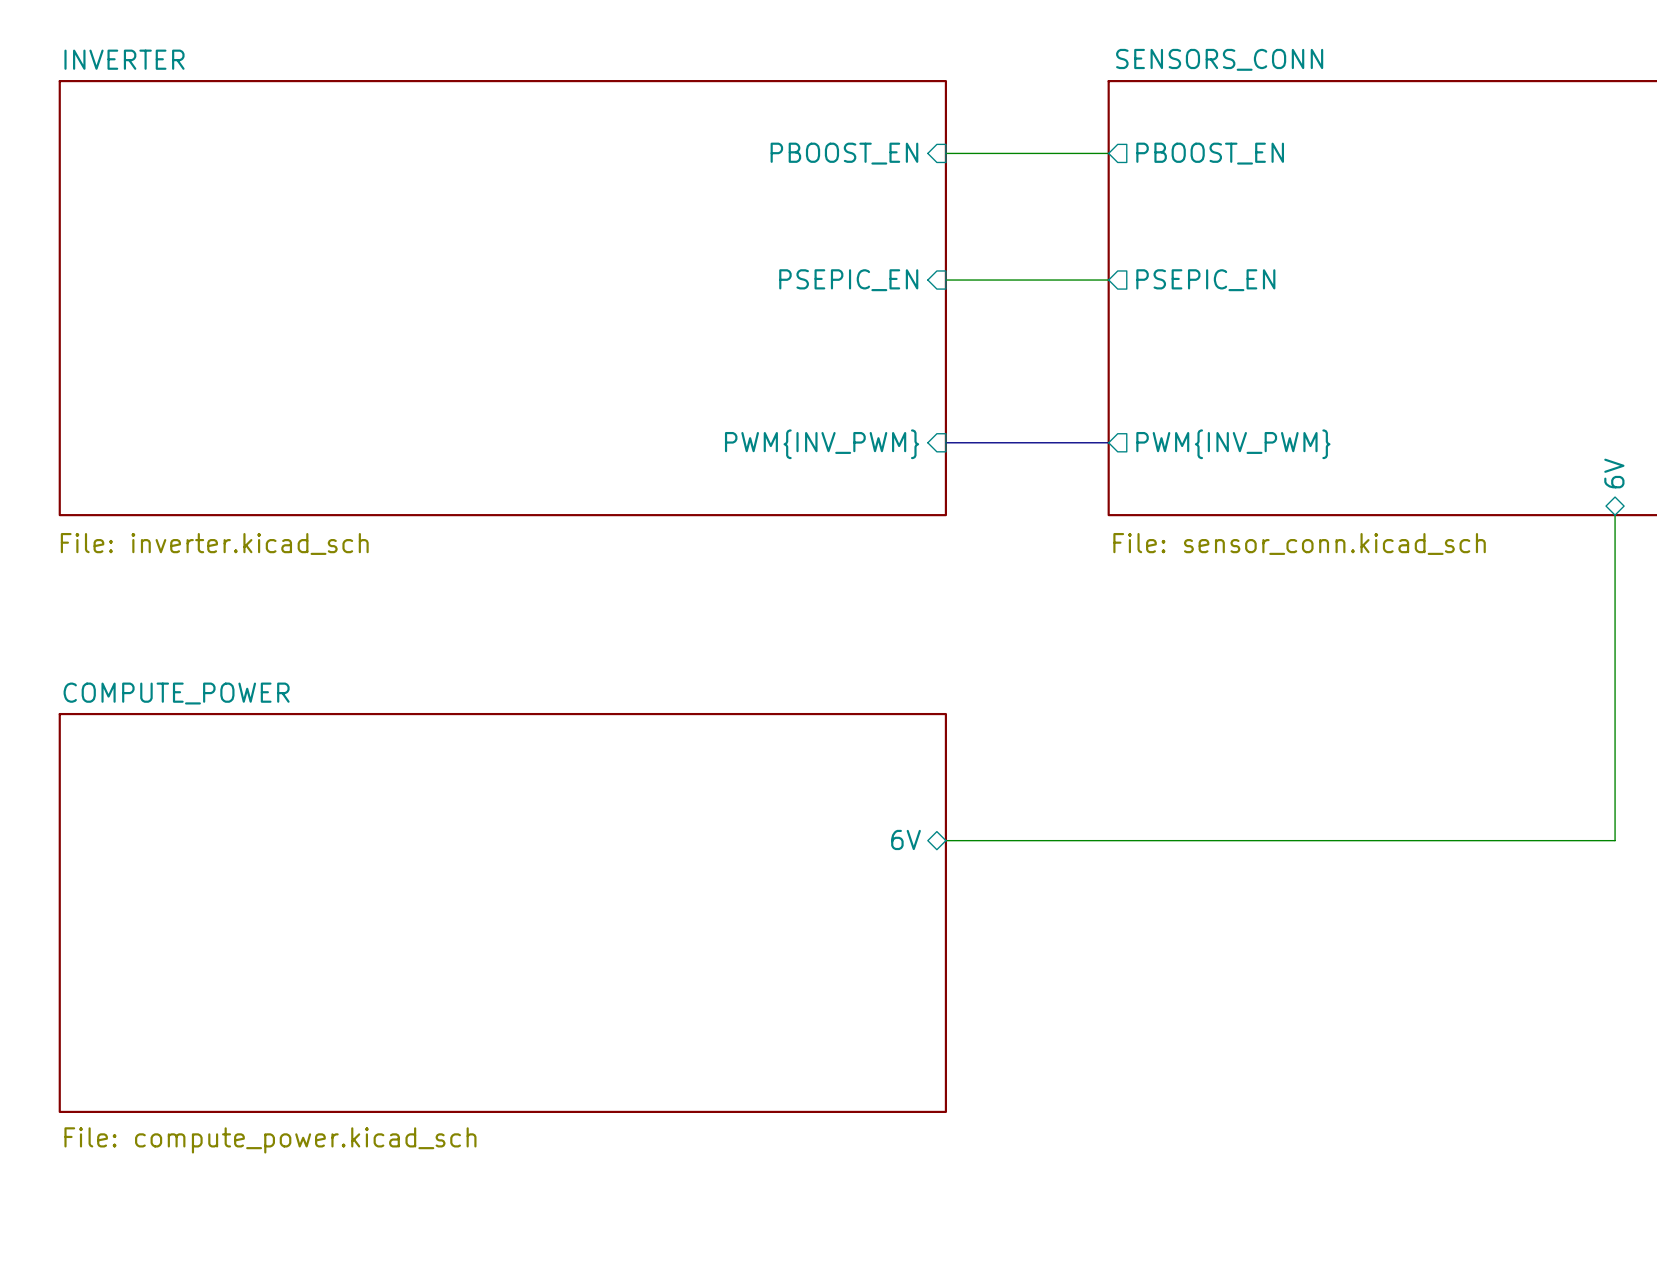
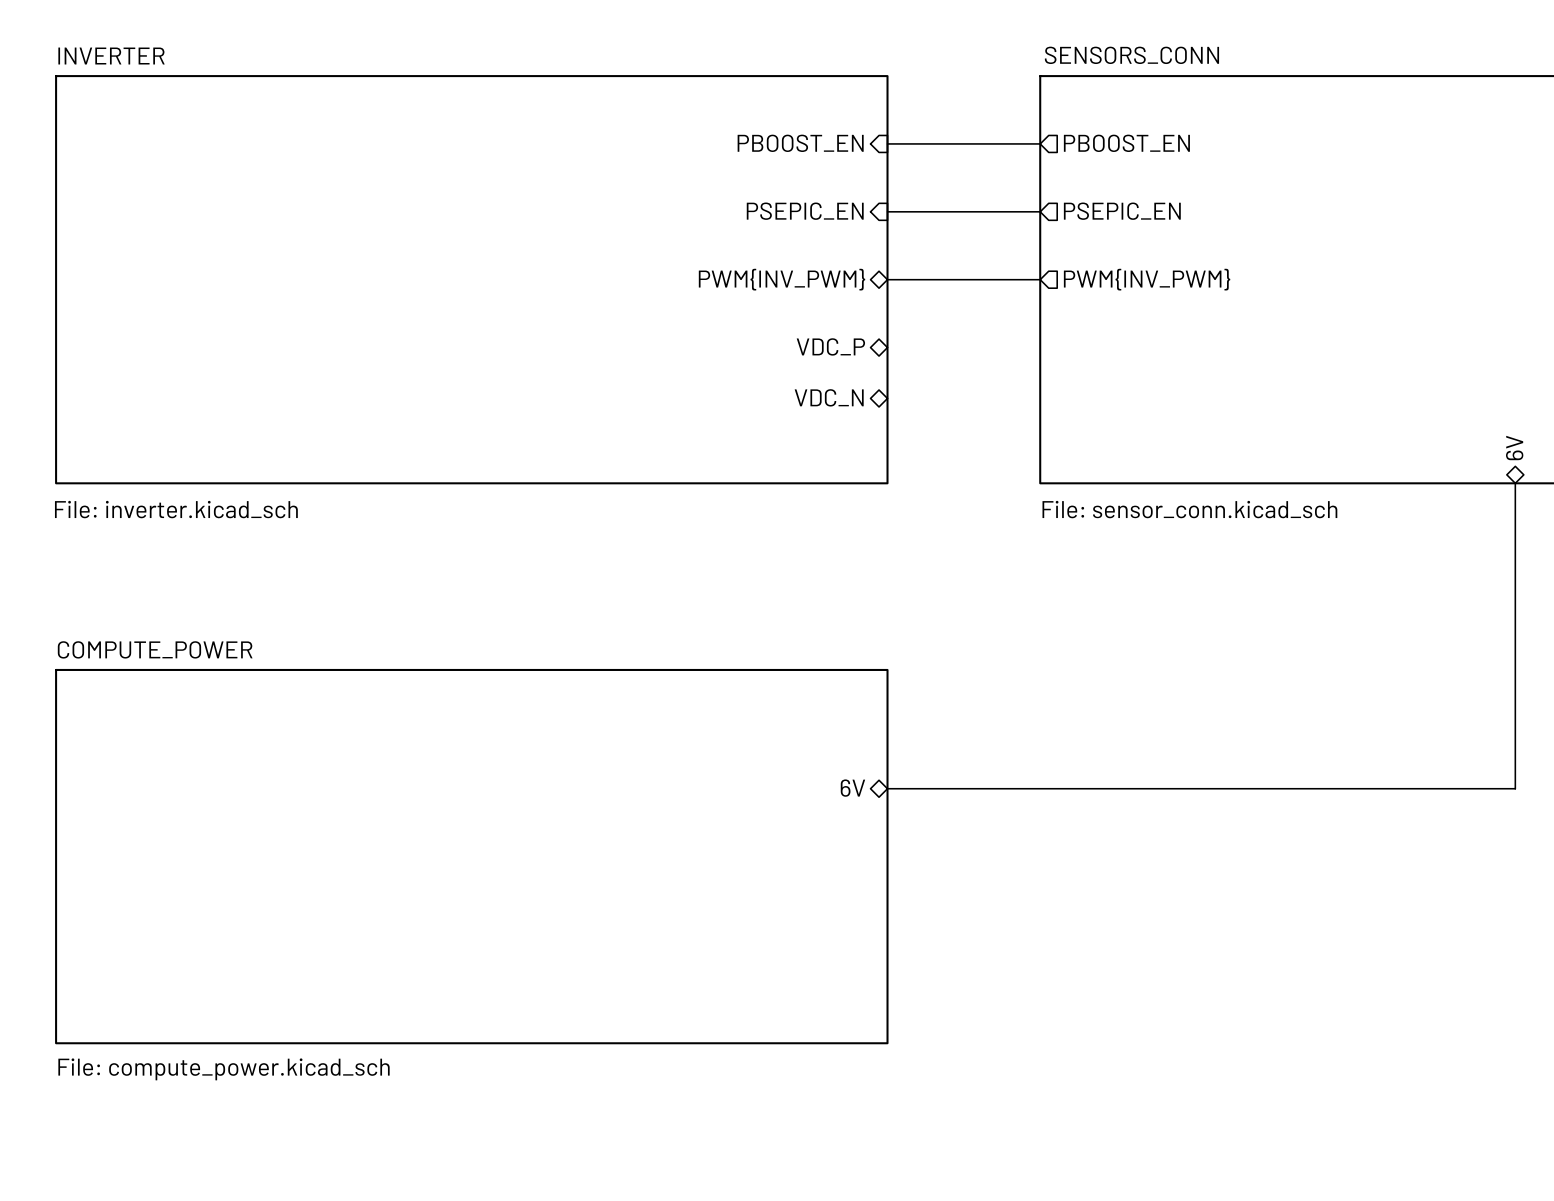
sheet pin position: PSEPIC_EN (848, 280) -> PSEPIC_EN (805, 211)
wire: (945, 280) (1108, 280) -> (887, 211) (1040, 211)
sheet pin position: PSEPIC_EN (1205, 280) -> PSEPIC_EN (1122, 211)
sheet pin: none -> PWM{INV_PWM} (782, 279)
sheet pin: none -> PWM{INV_PWM} (1147, 279)
sheet pin: none -> VDC_P (830, 346)
sheet pin: none -> VDC_N (829, 397)
bus: (945, 442) (1108, 442) -> (887, 279) (1040, 279)
sheet pin: PWM{INV_PWM} (822, 444) -> none
sheet pin: PWM{INV_PWM} (1233, 444) -> none

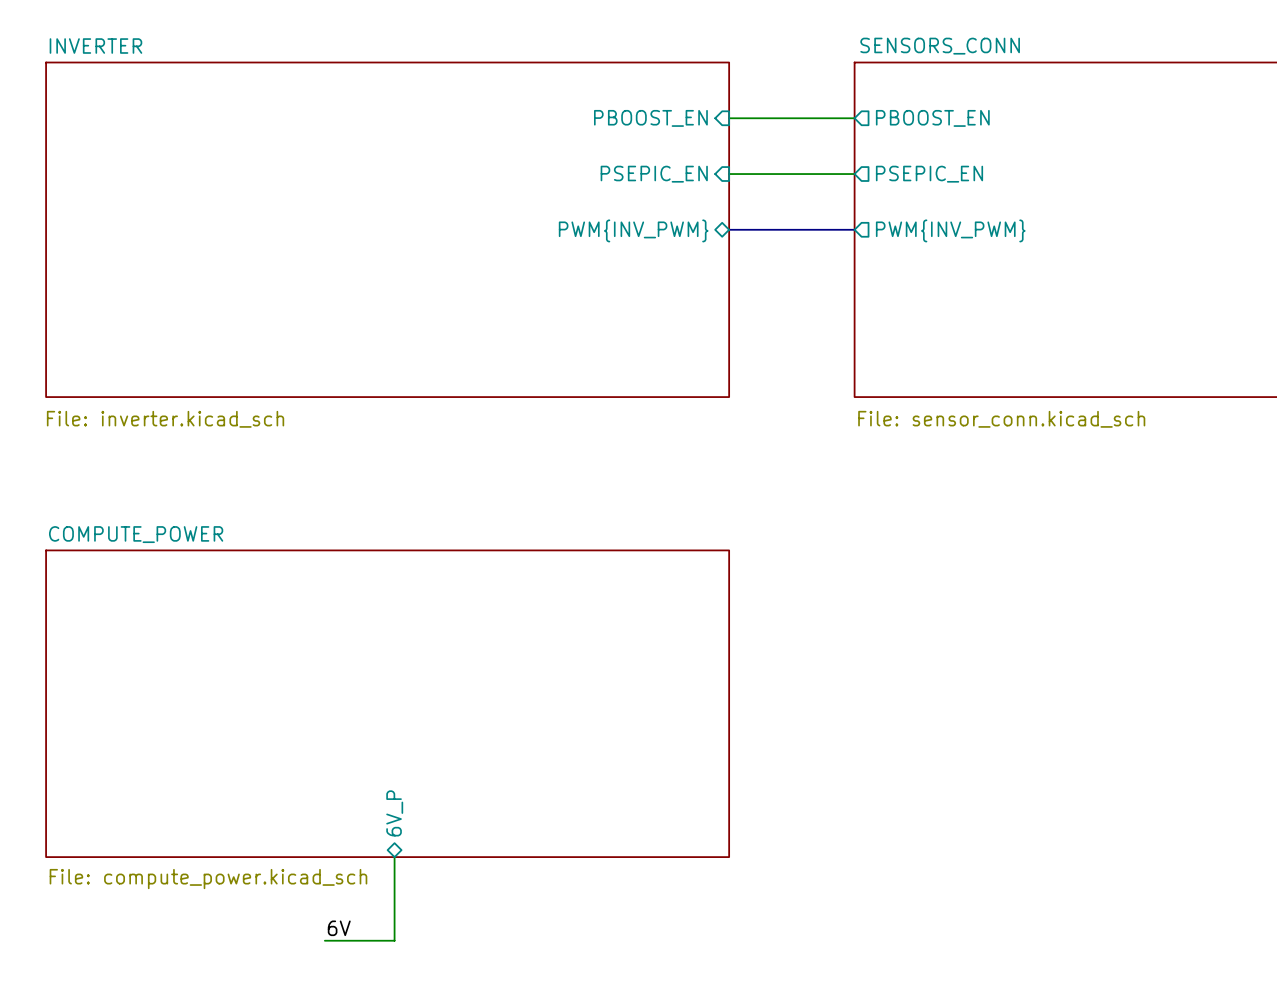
sheet pin: VDC_P (830, 346) -> none
sheet pin: VDC_N (829, 397) -> none
sheet pin: 6V (1514, 447) -> none
wire: (1515, 483) (1515, 788) (887, 788) -> none
sheet pin: 6V (852, 788) -> none
sheet pin: none -> 6V_P (394, 813)
wire: none -> (394, 857) (394, 940) (324, 940)
label: none -> 6V (339, 928)

